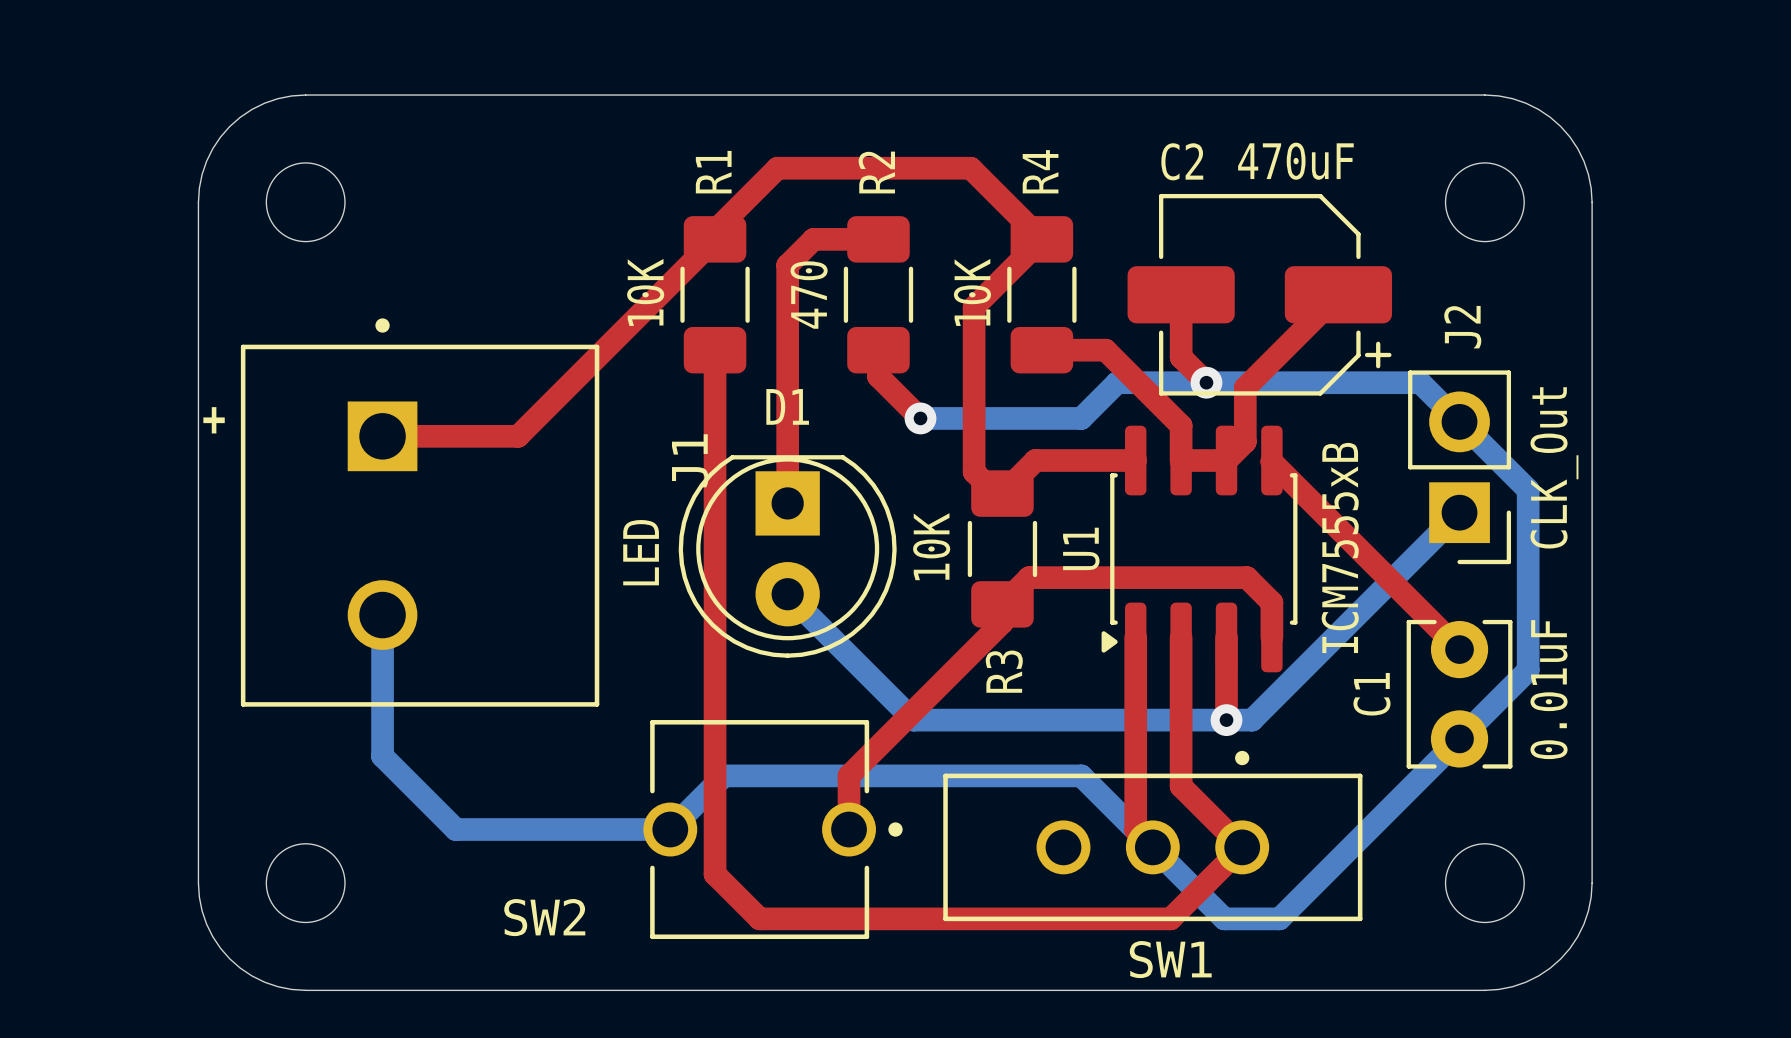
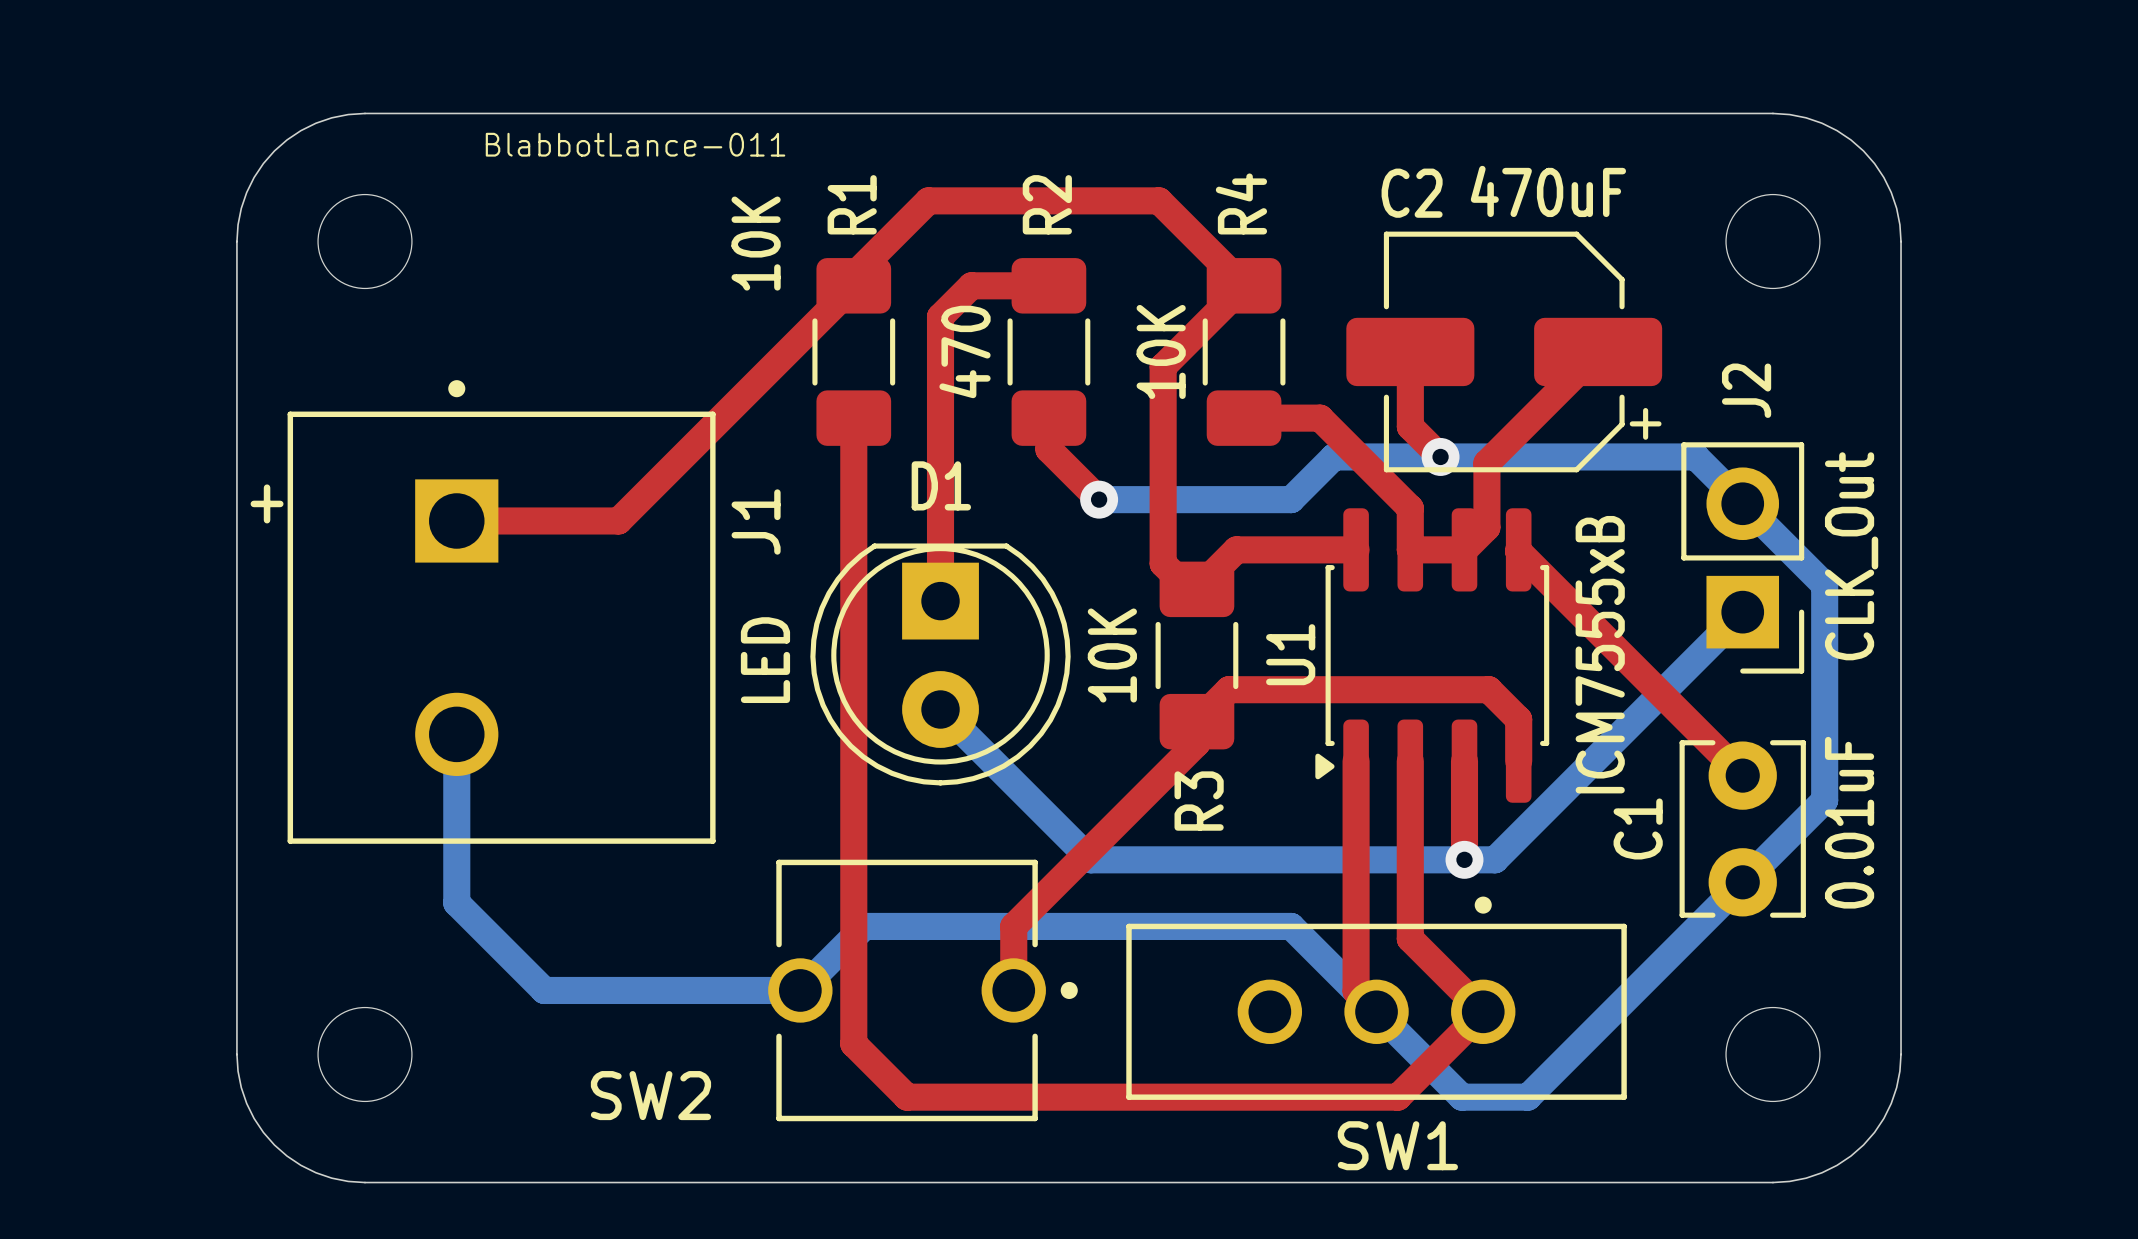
text: none -> BlabbotLance-011 (635, 144)
R1 value position: 10K (645, 292) -> 10K (756, 243)
J1 name position: J1 (690, 460) -> J1 (756, 522)

